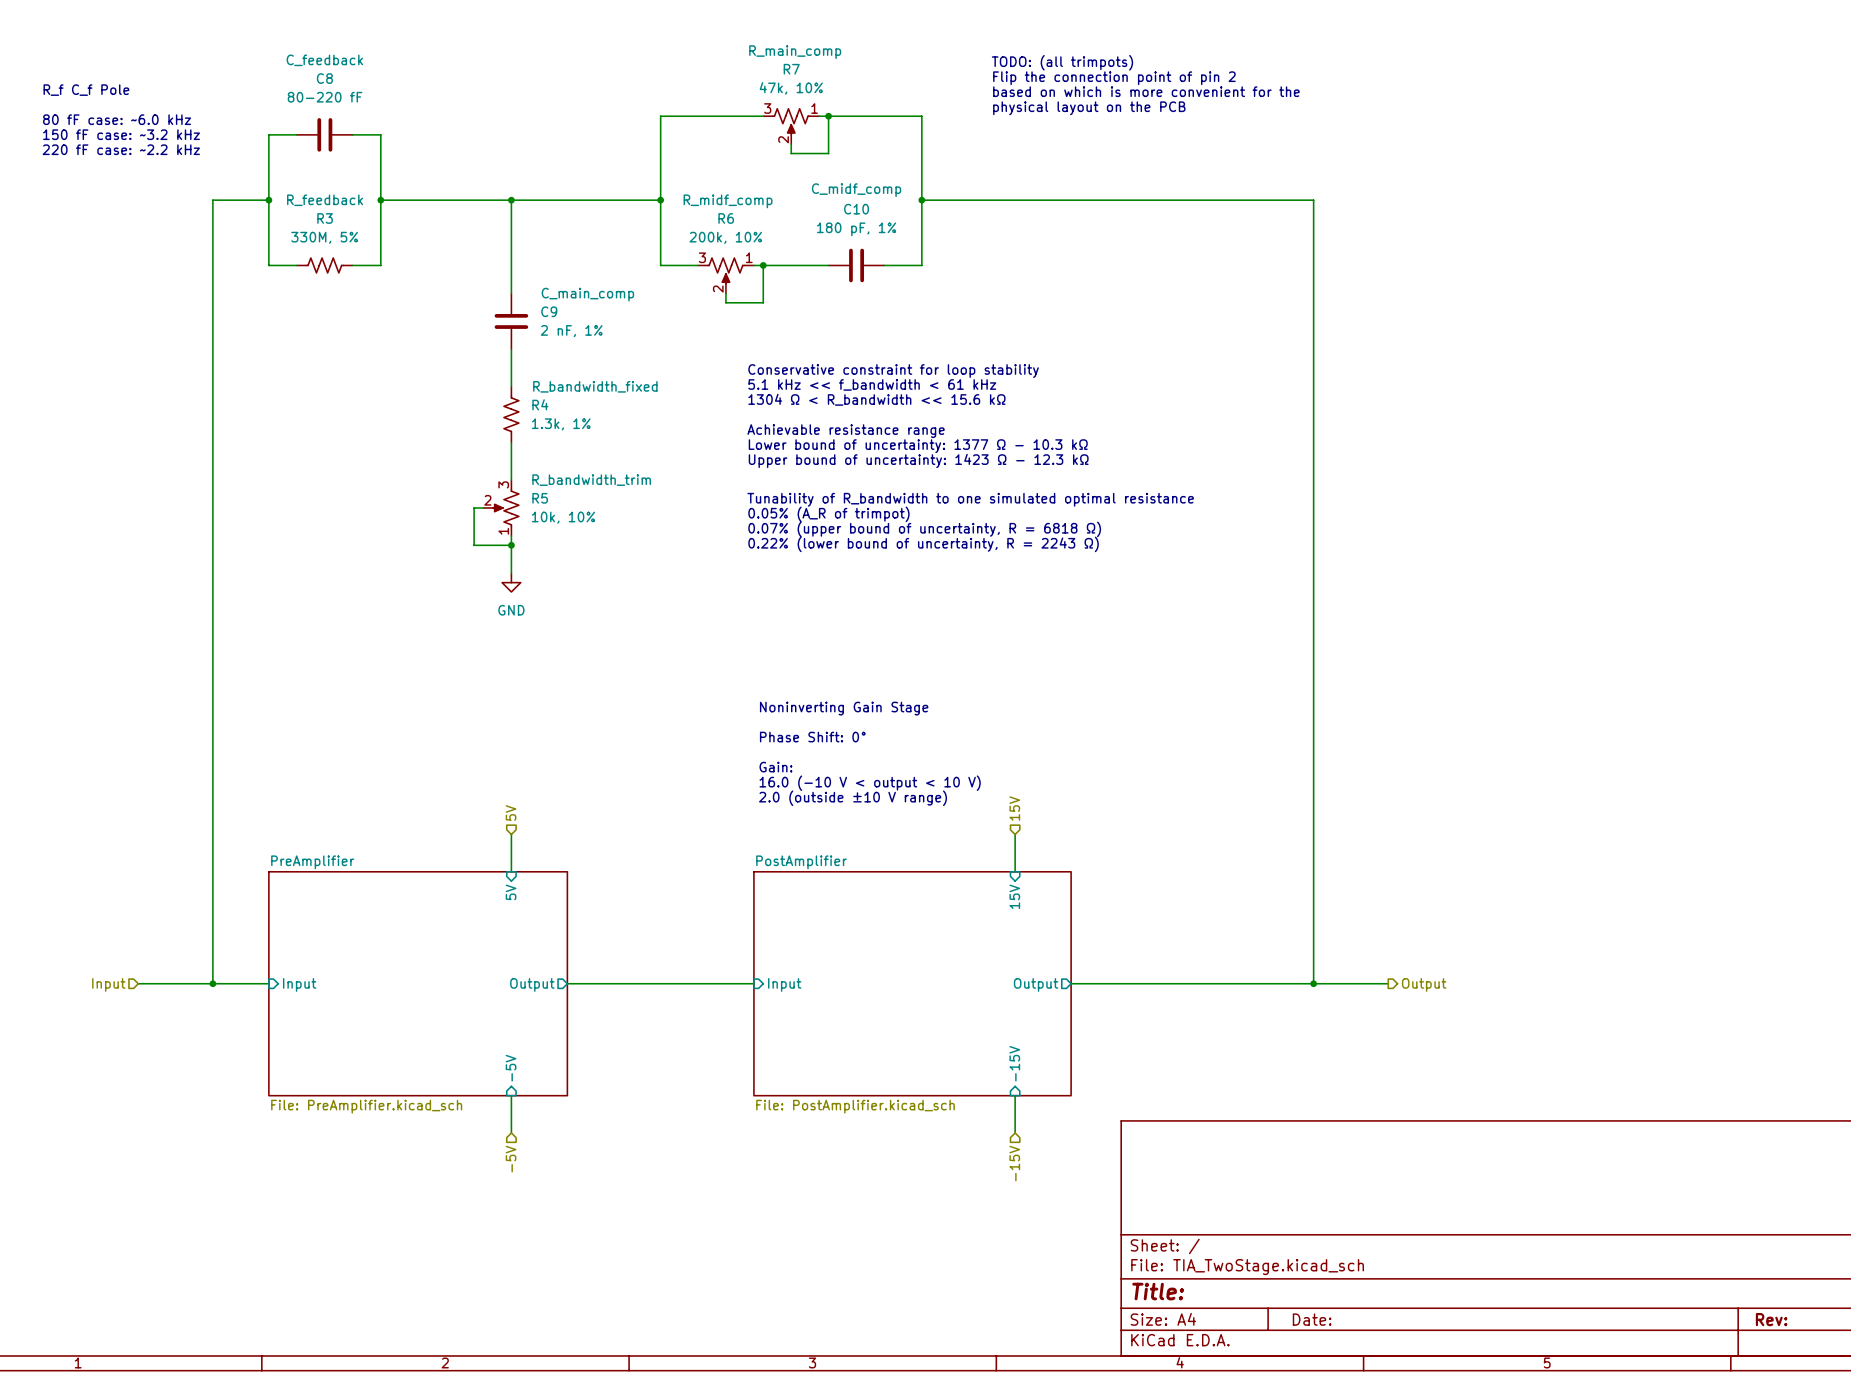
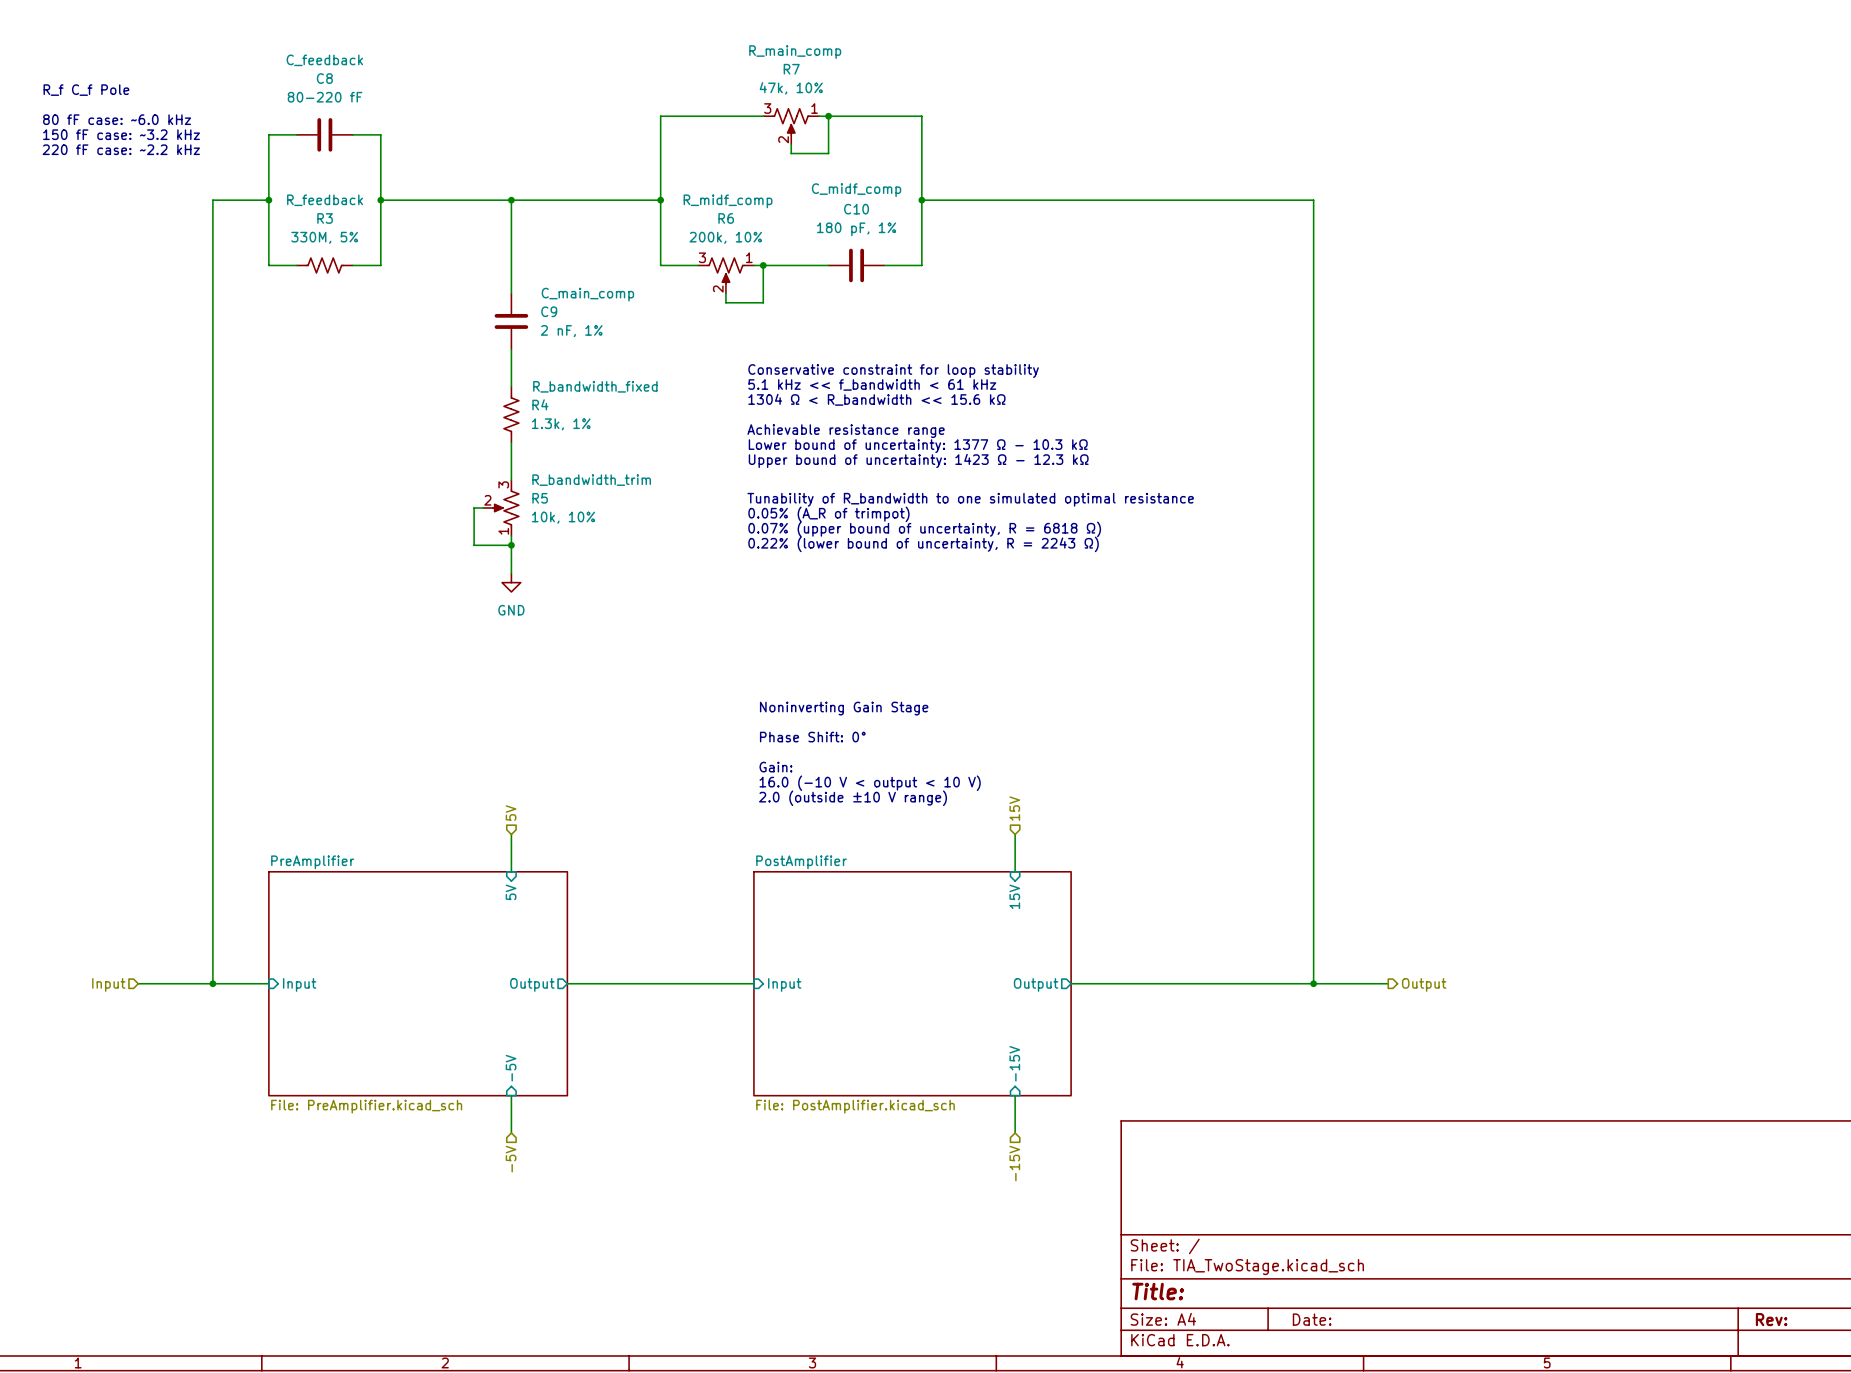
text: TODO: (all trimpots) (1062, 62) -> none
text: Flip the connection point of pin 2 (1114, 78) -> none
text: based on which is more convenient for the (1146, 91) -> none
text: physical layout on the PCB (1089, 108) -> none

